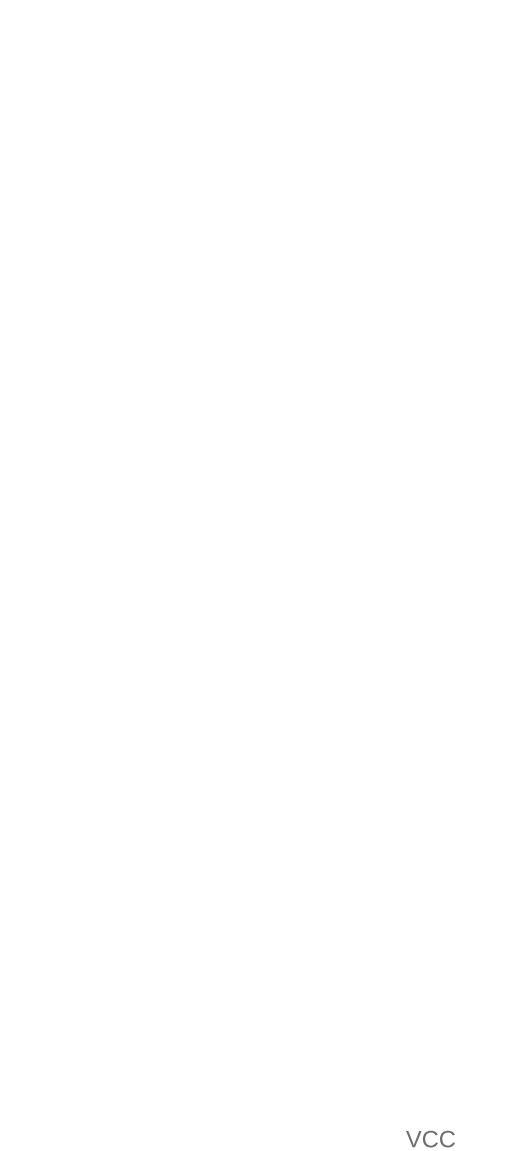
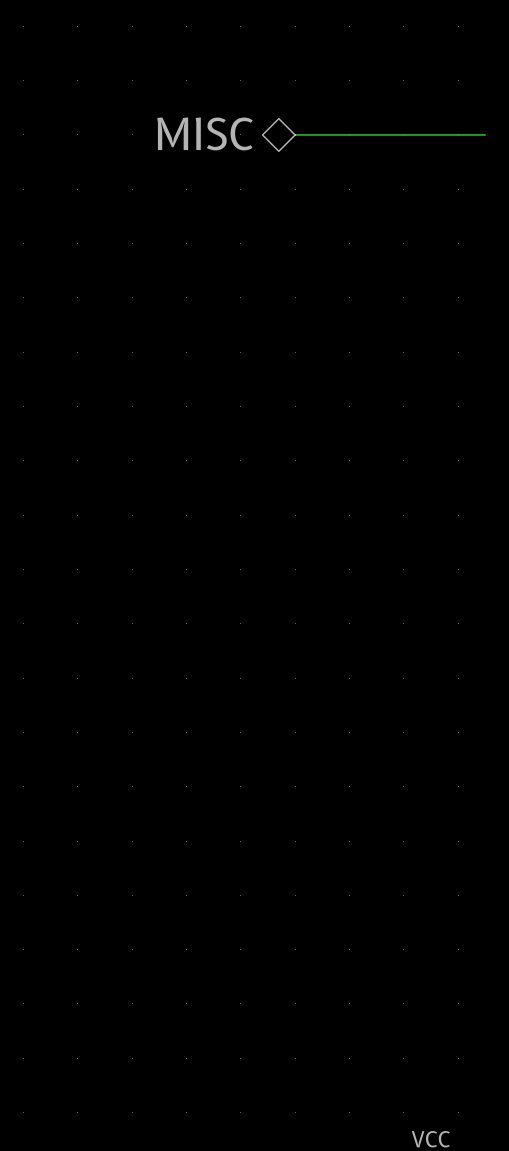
hierarchical label: none -> MISC (205, 133)
wire: none -> (295, 134) (485, 134)

